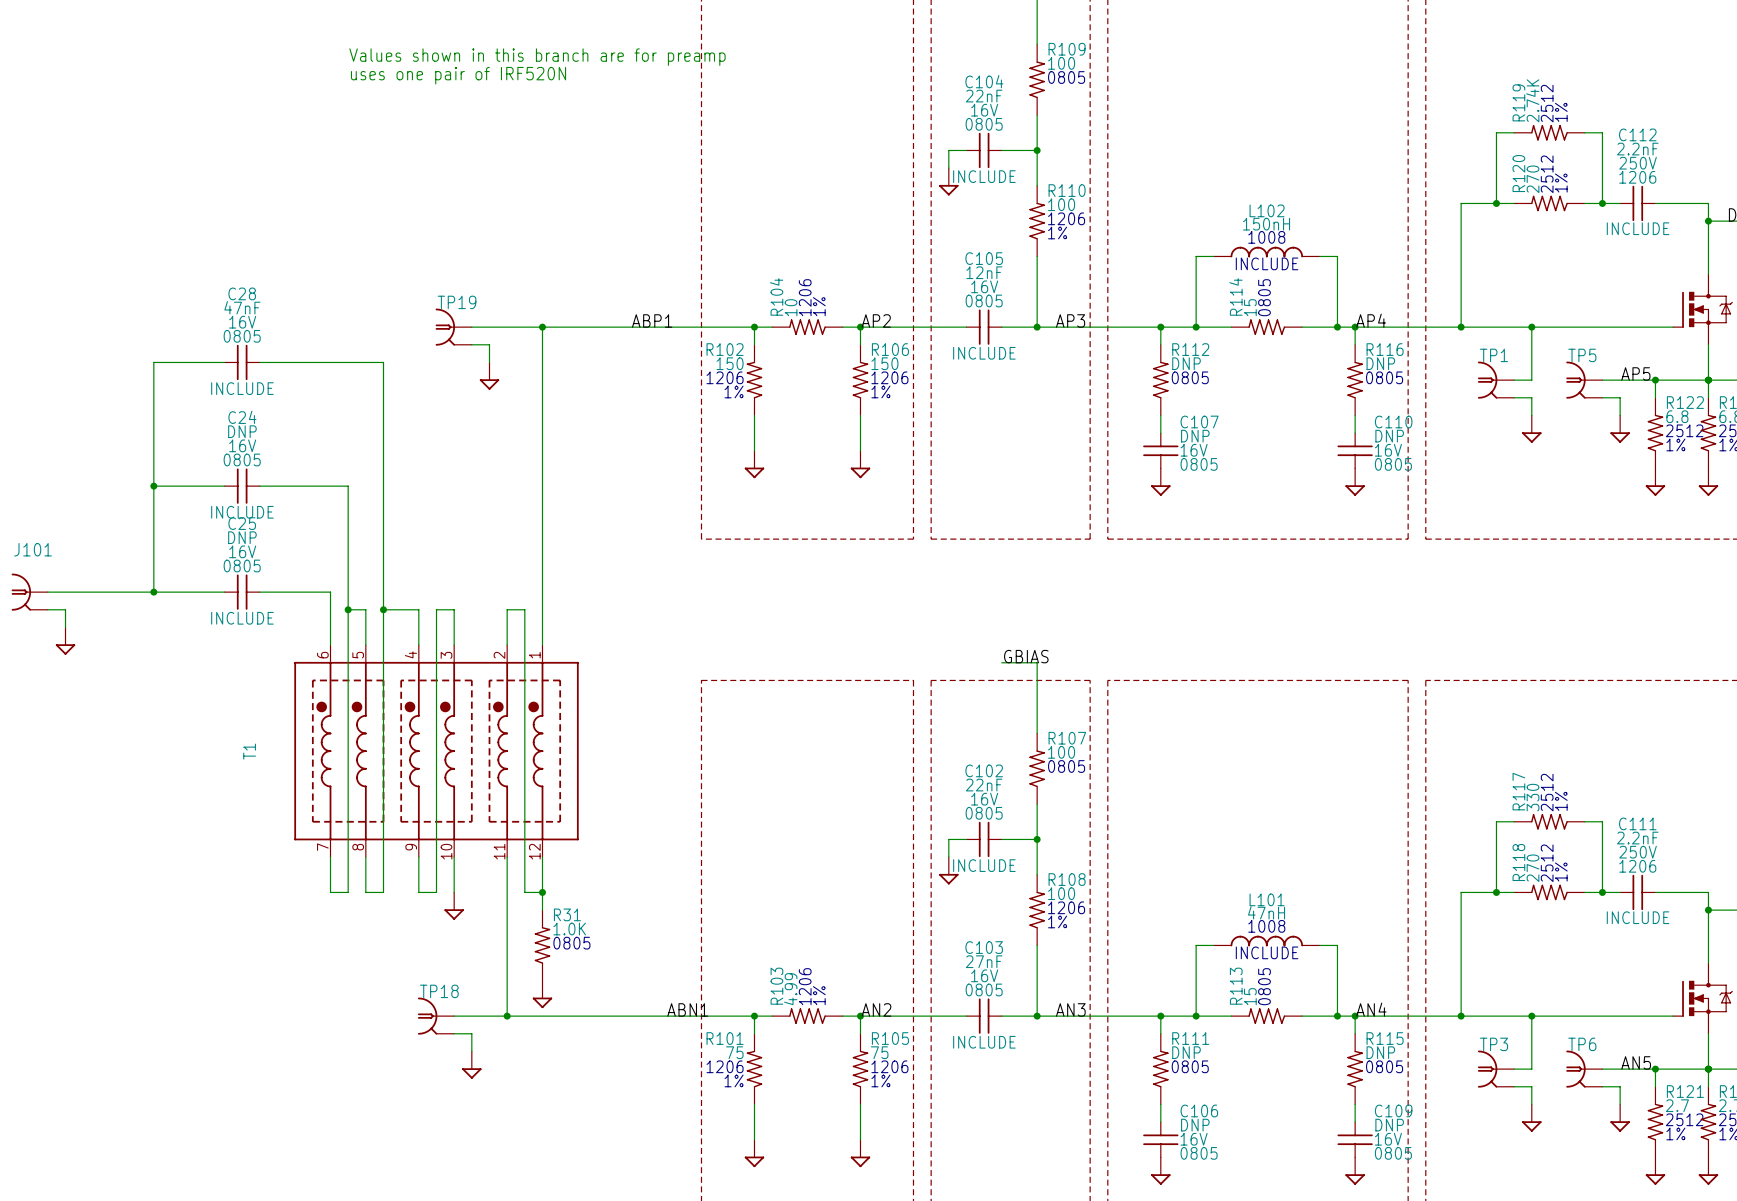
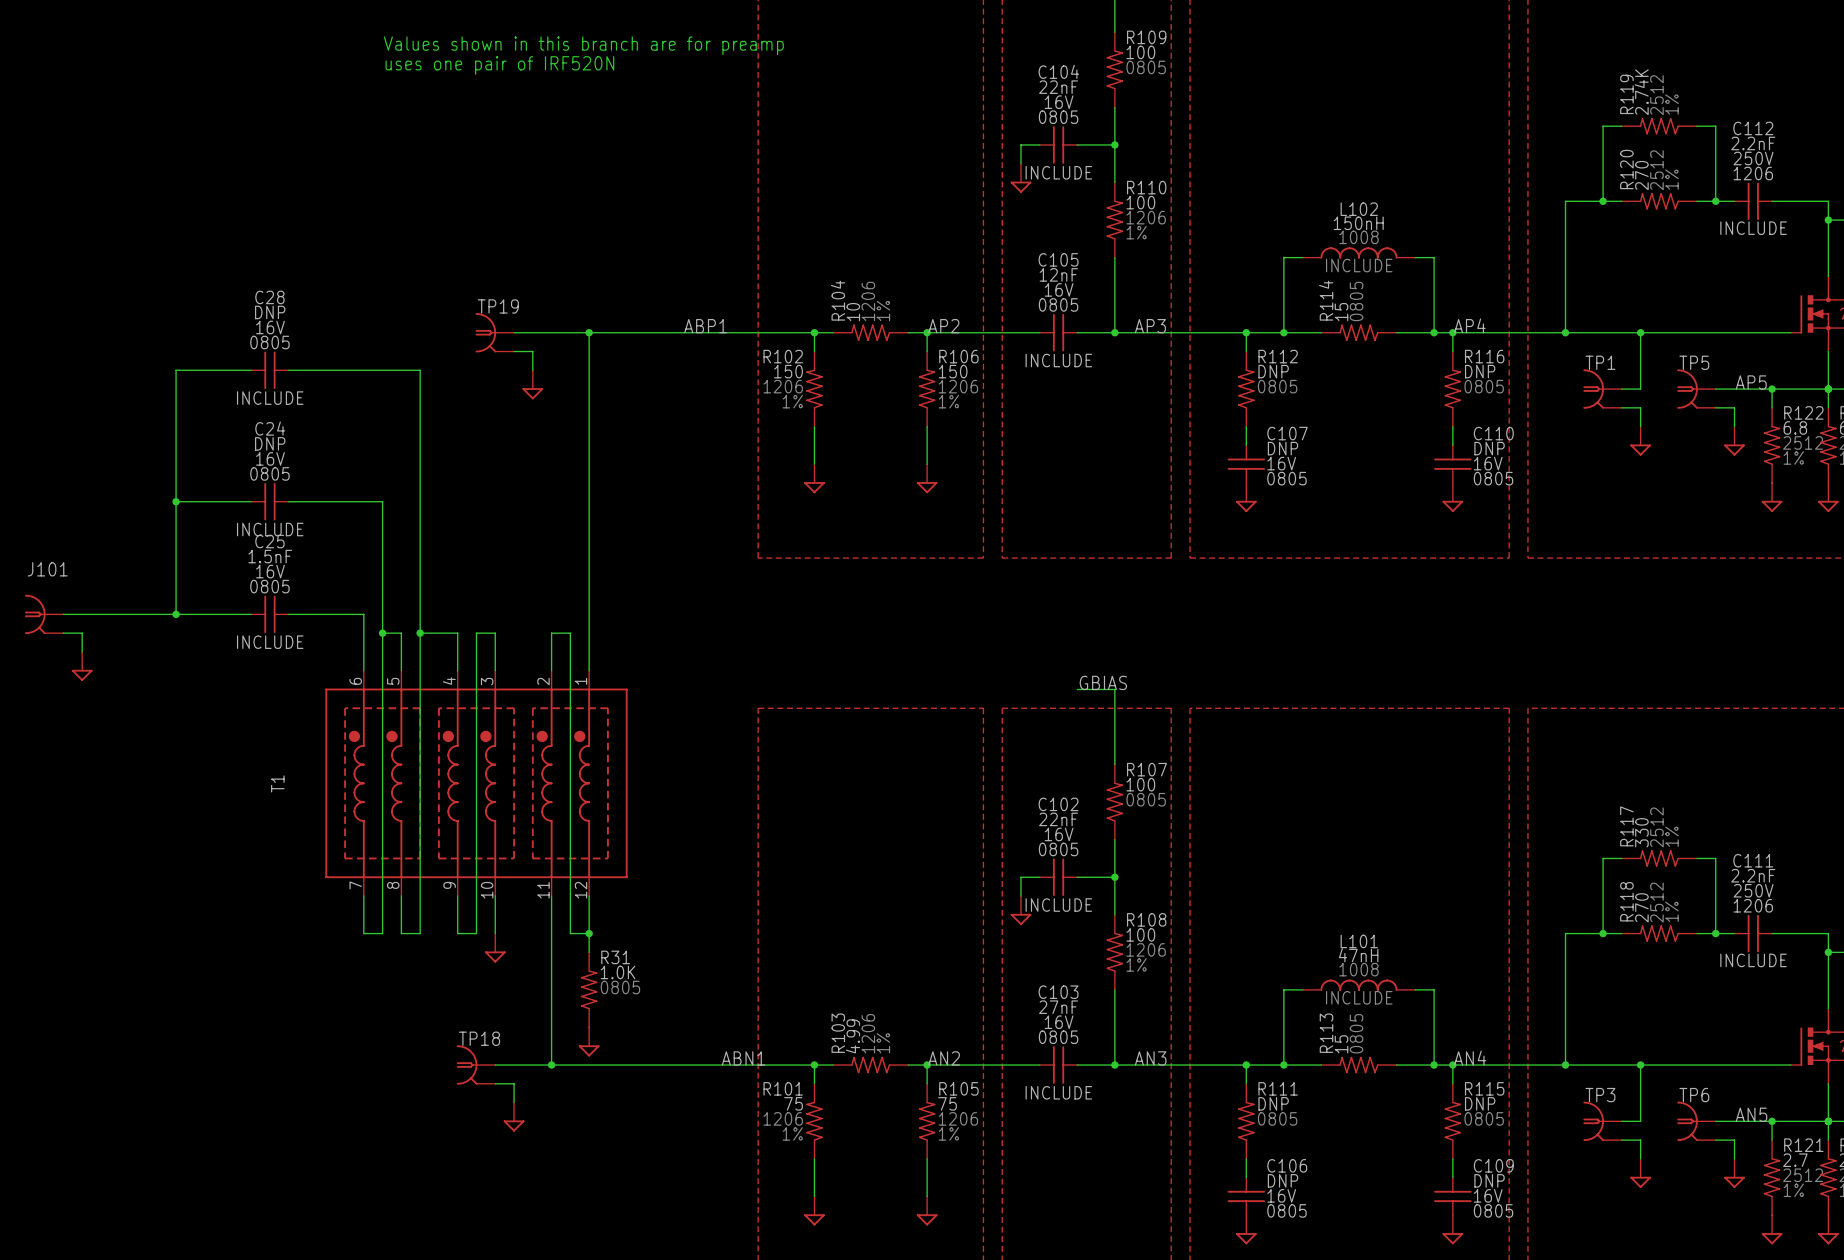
C28 value: 47nF (242, 307) -> DNP (270, 312)
C25 value: DNP (242, 537) -> 1.5nF (270, 556)

